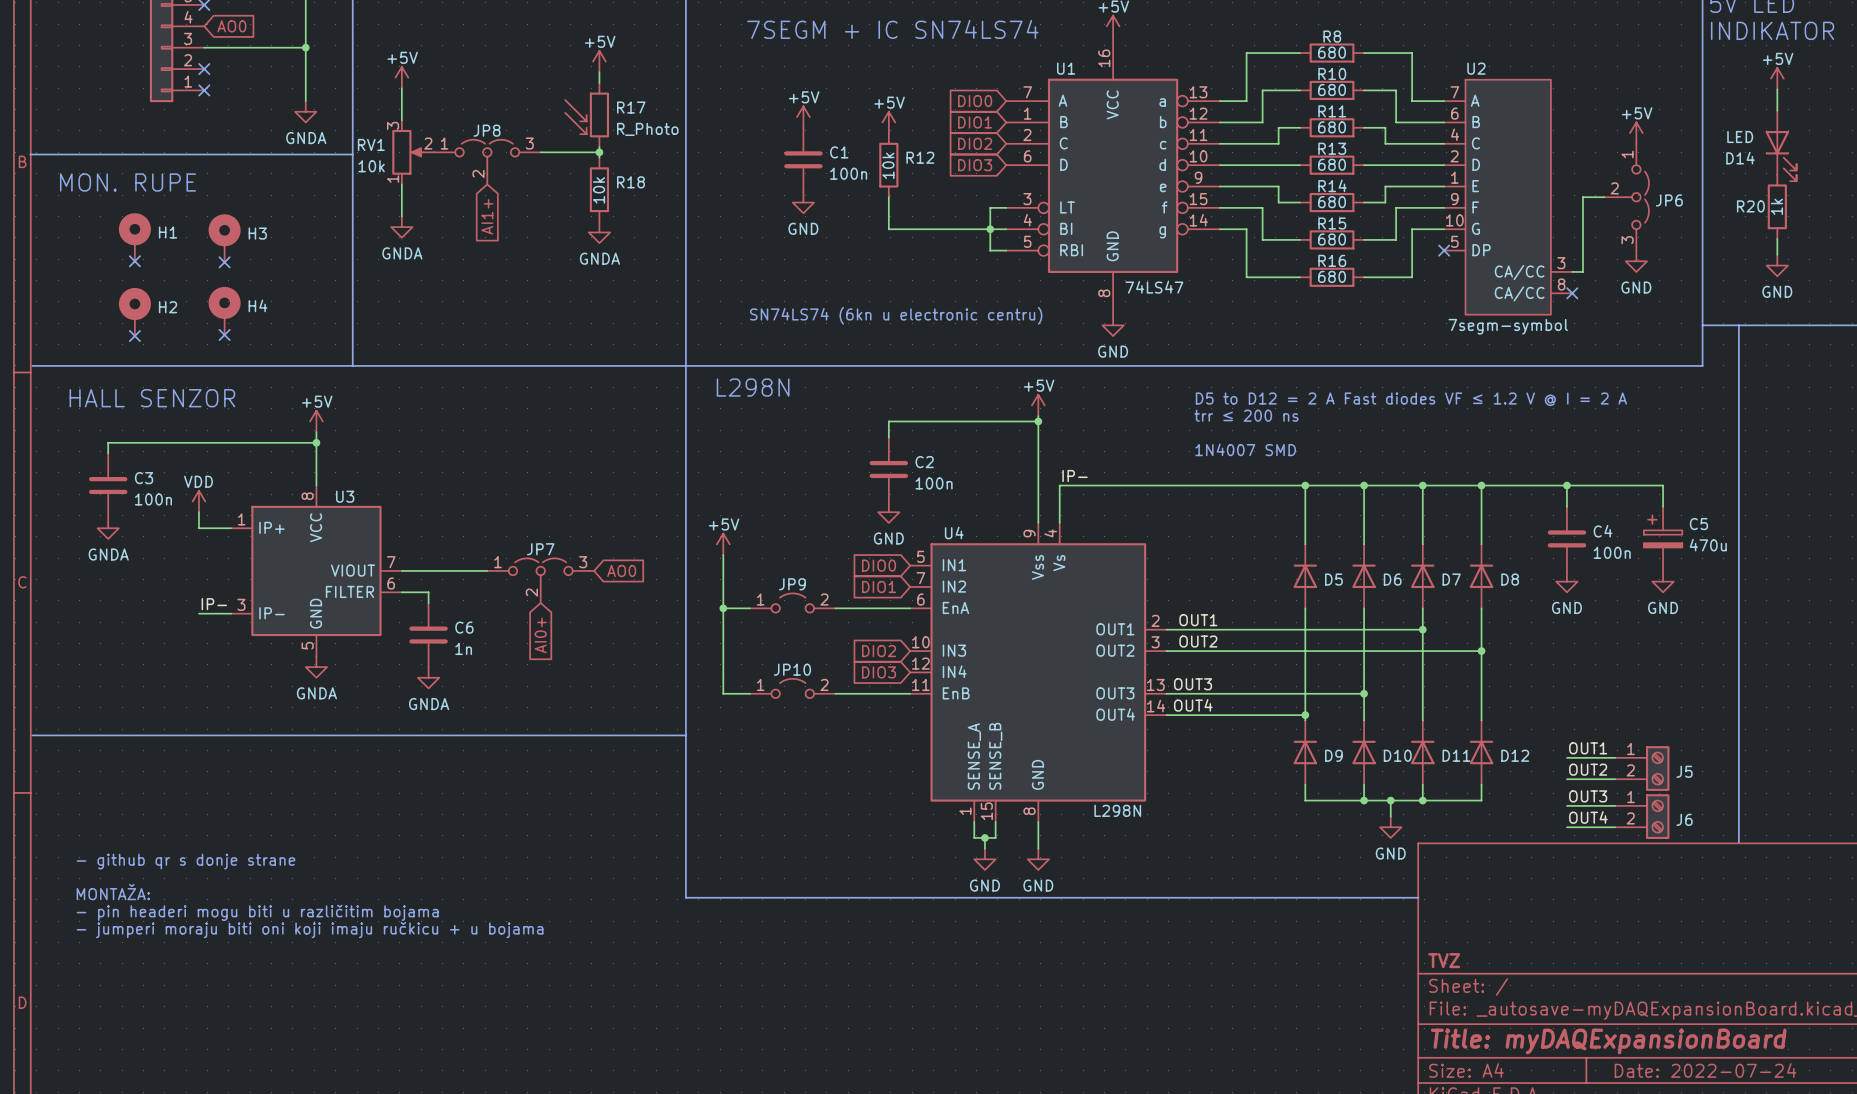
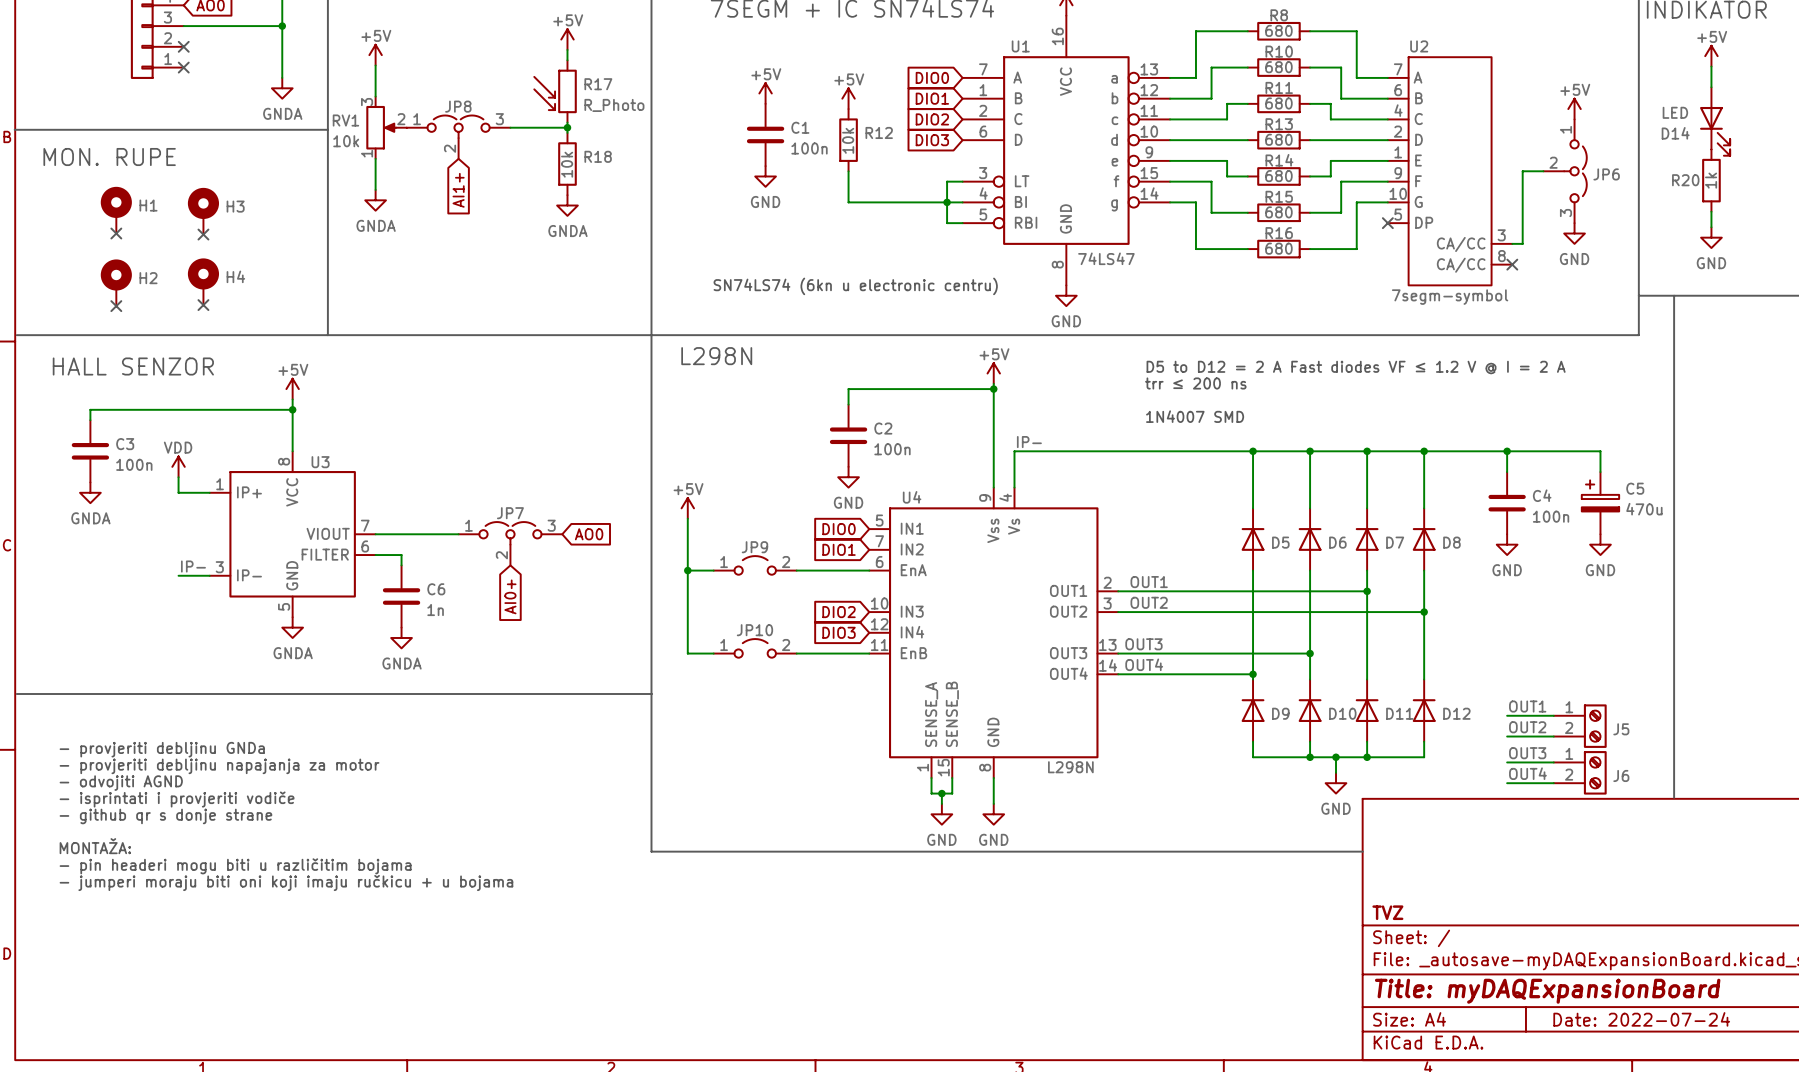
text: none -> - provjeriti debljinu GNDa (162, 749)
text: none -> - provjeriti debljinu napajanja za motor (219, 766)
text: none -> - odvojiti AGND (121, 783)
text: none -> - isprintati i provjeriti vodiče (177, 799)

